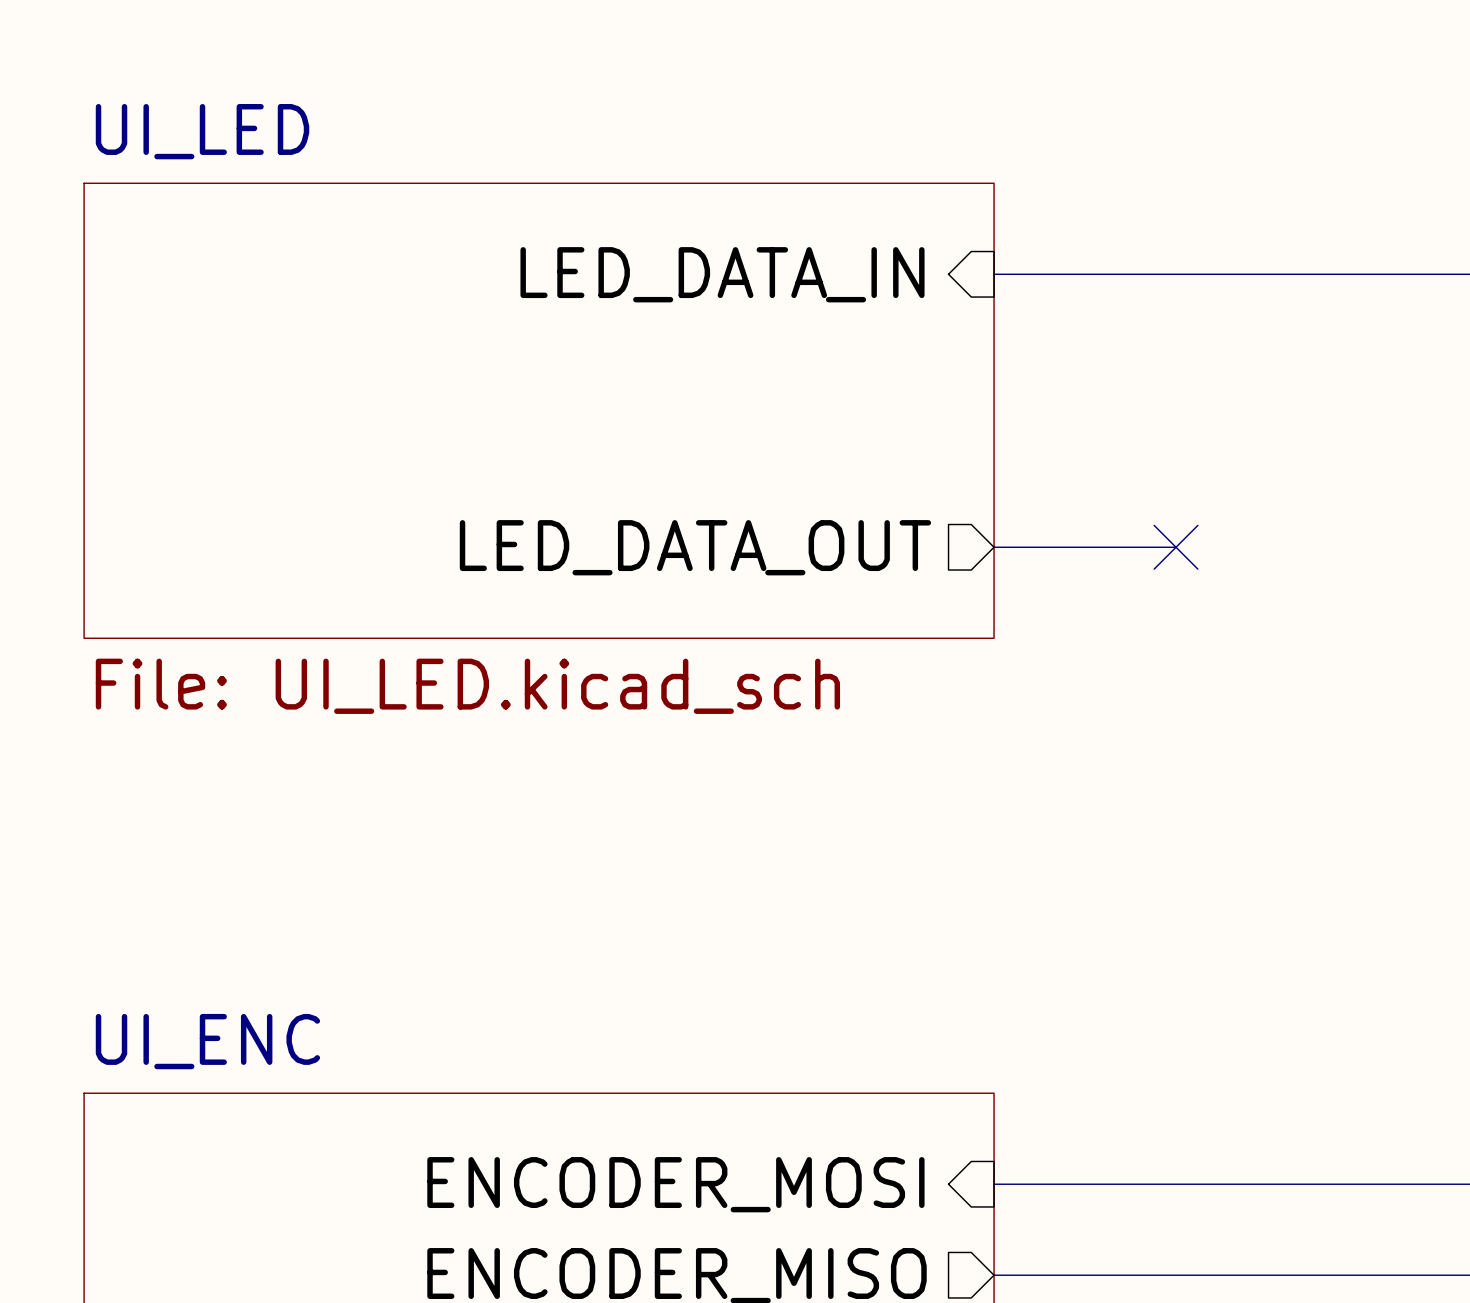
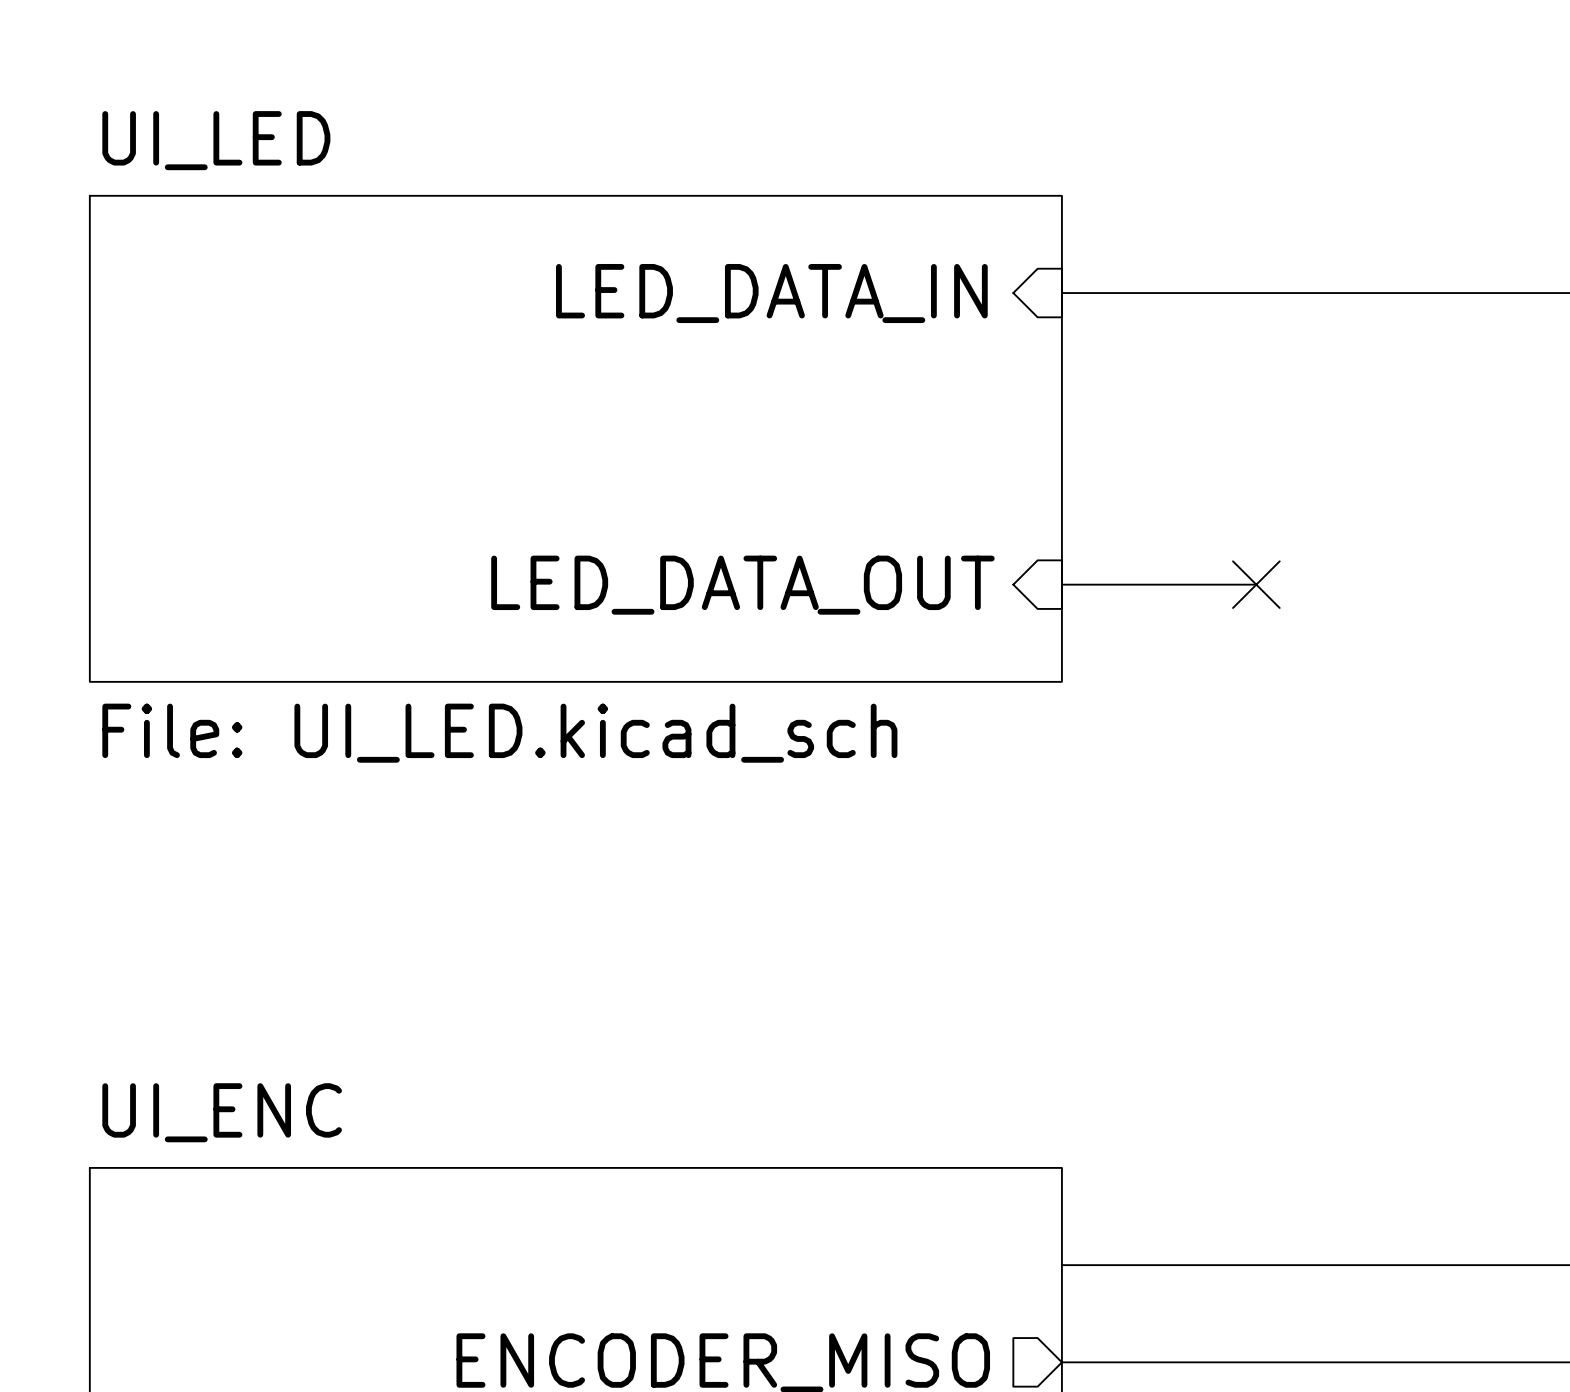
sheet pin shape: output (695, 547) -> input (742, 585)
sheet pin: ENCODER_MOSI (675, 1184) -> none

